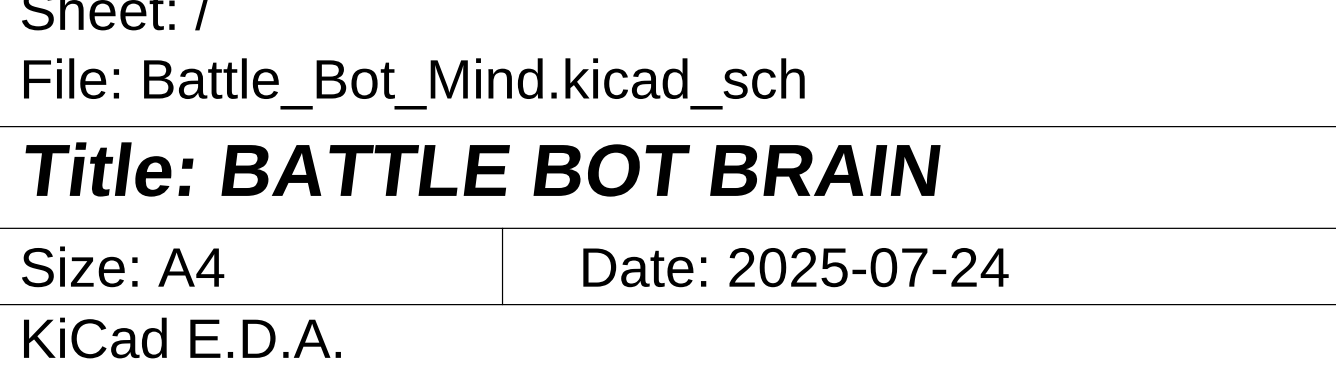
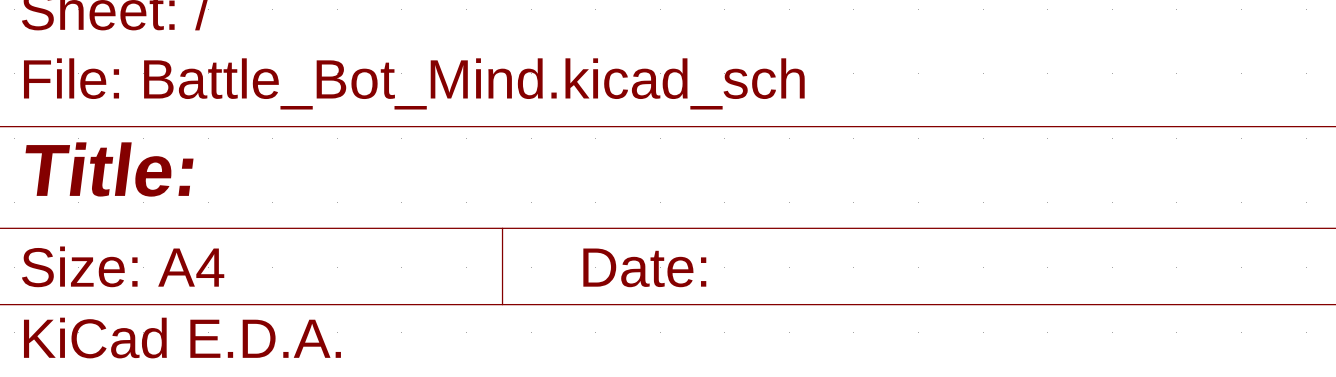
title block: Title: BATTLE BOT BRAIN (483, 169) -> Title: (109, 169)
title block: Date: 2025-07-24 (796, 267) -> Date: (644, 267)

